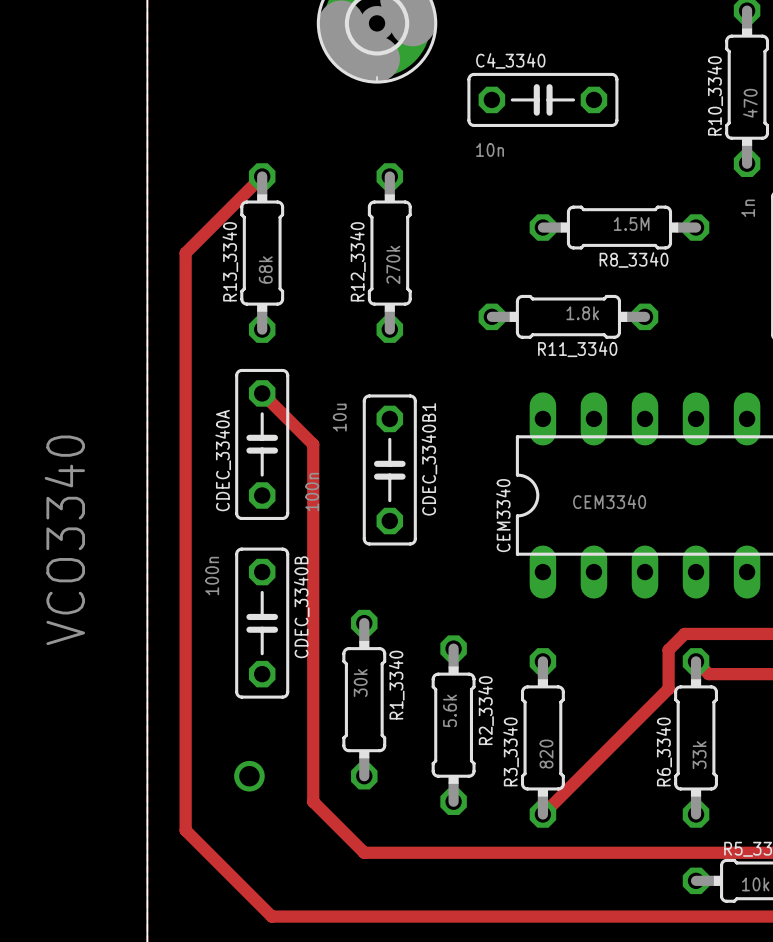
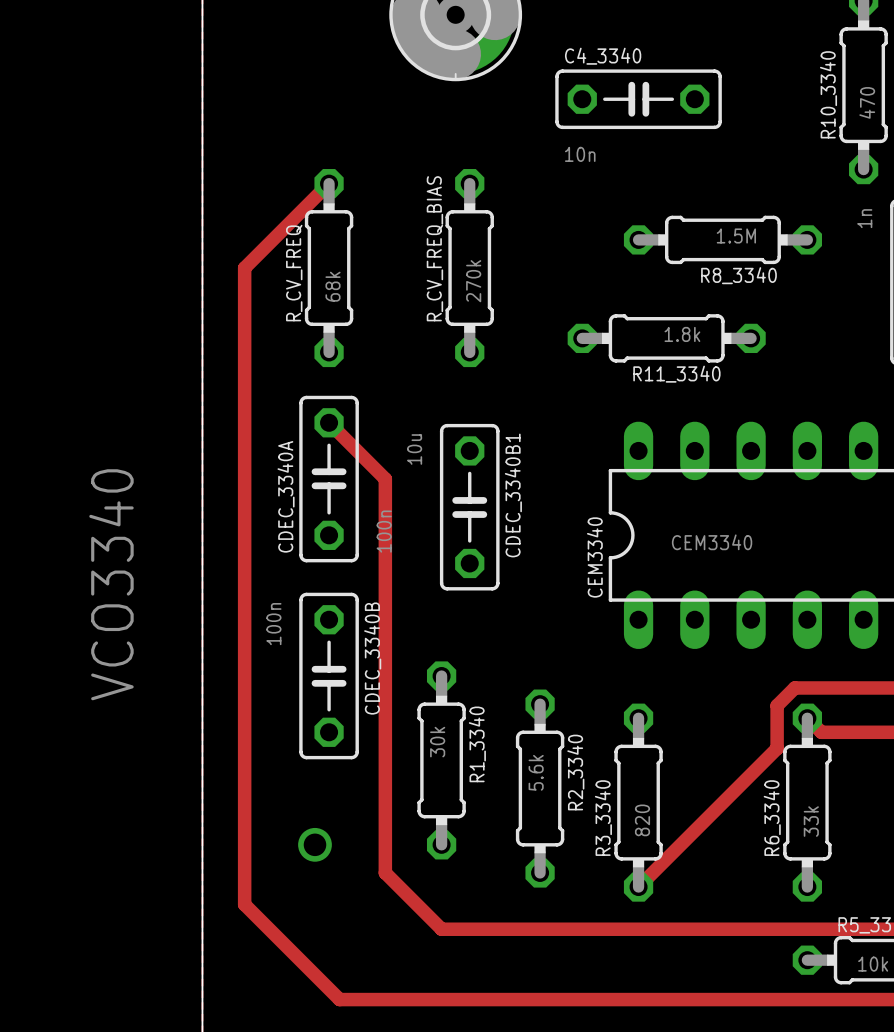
R13_3340 name: R13_3340 (230, 261) -> R_CV_FREQ (294, 273)
R12_3340 name: R12_3340 (357, 261) -> R_CV_FREQ_BIAS (434, 248)

